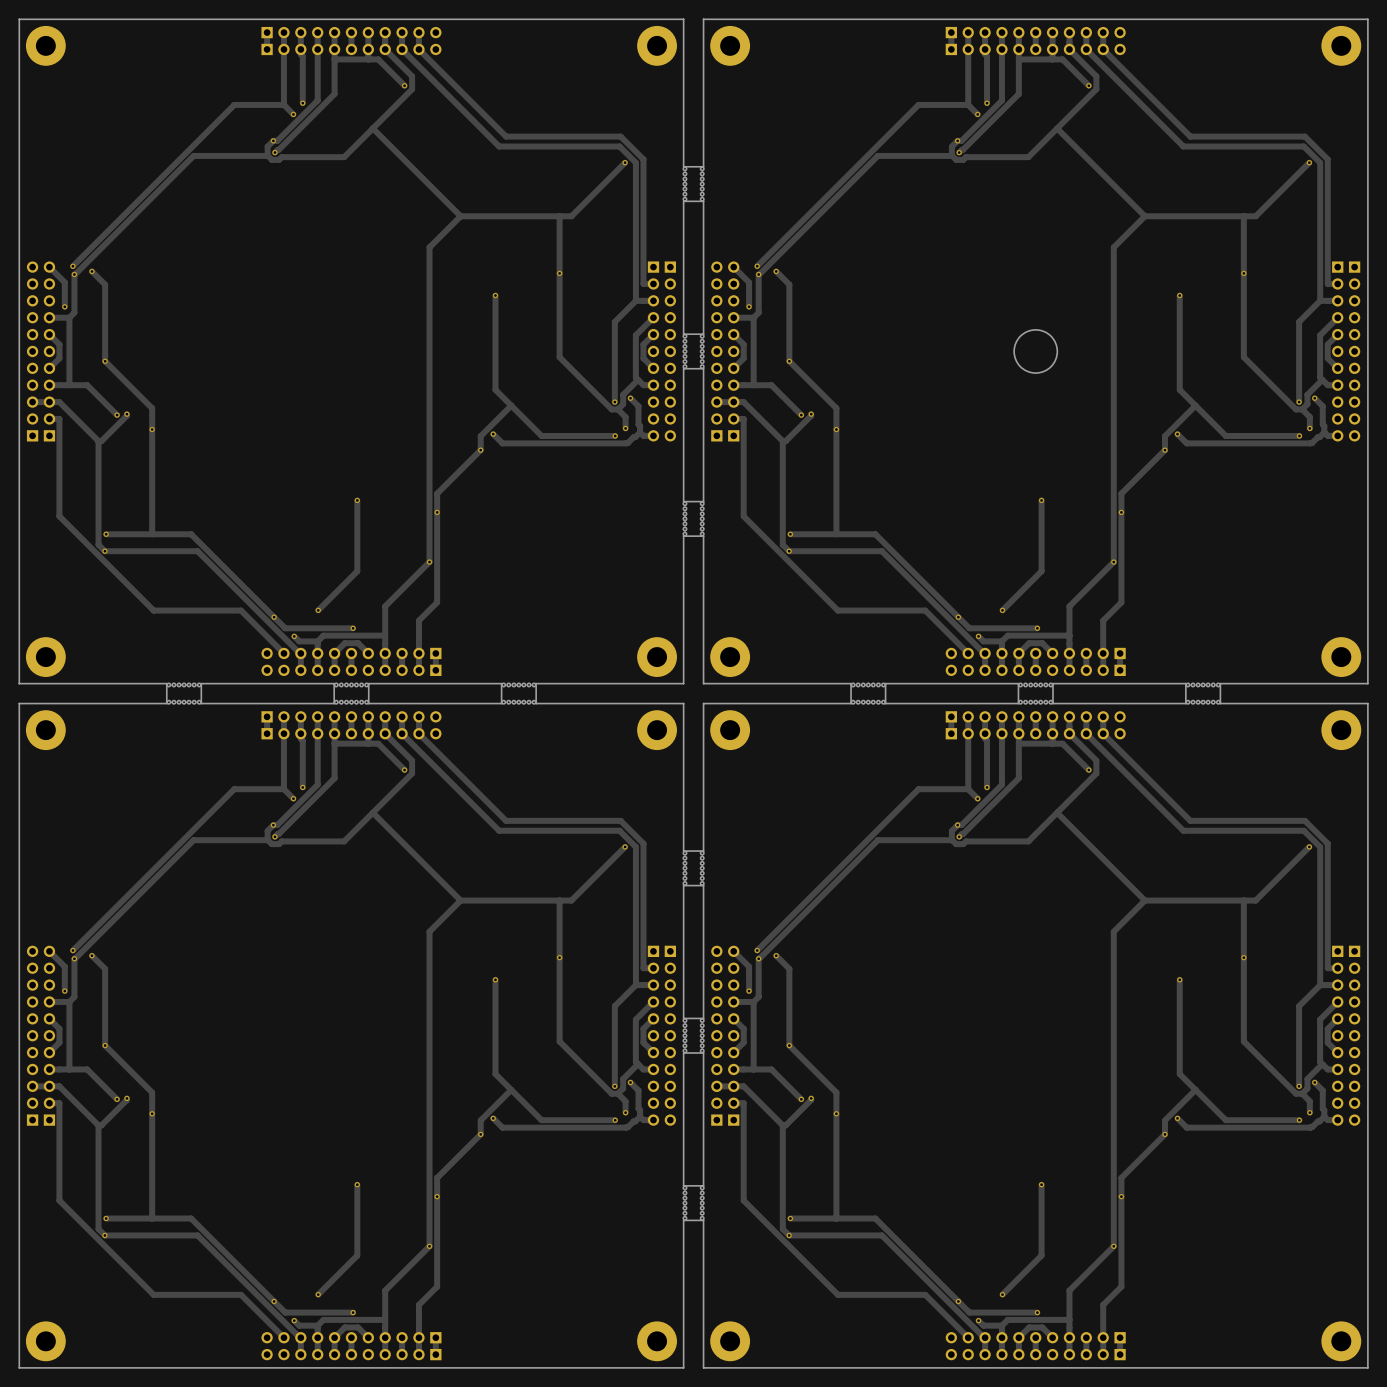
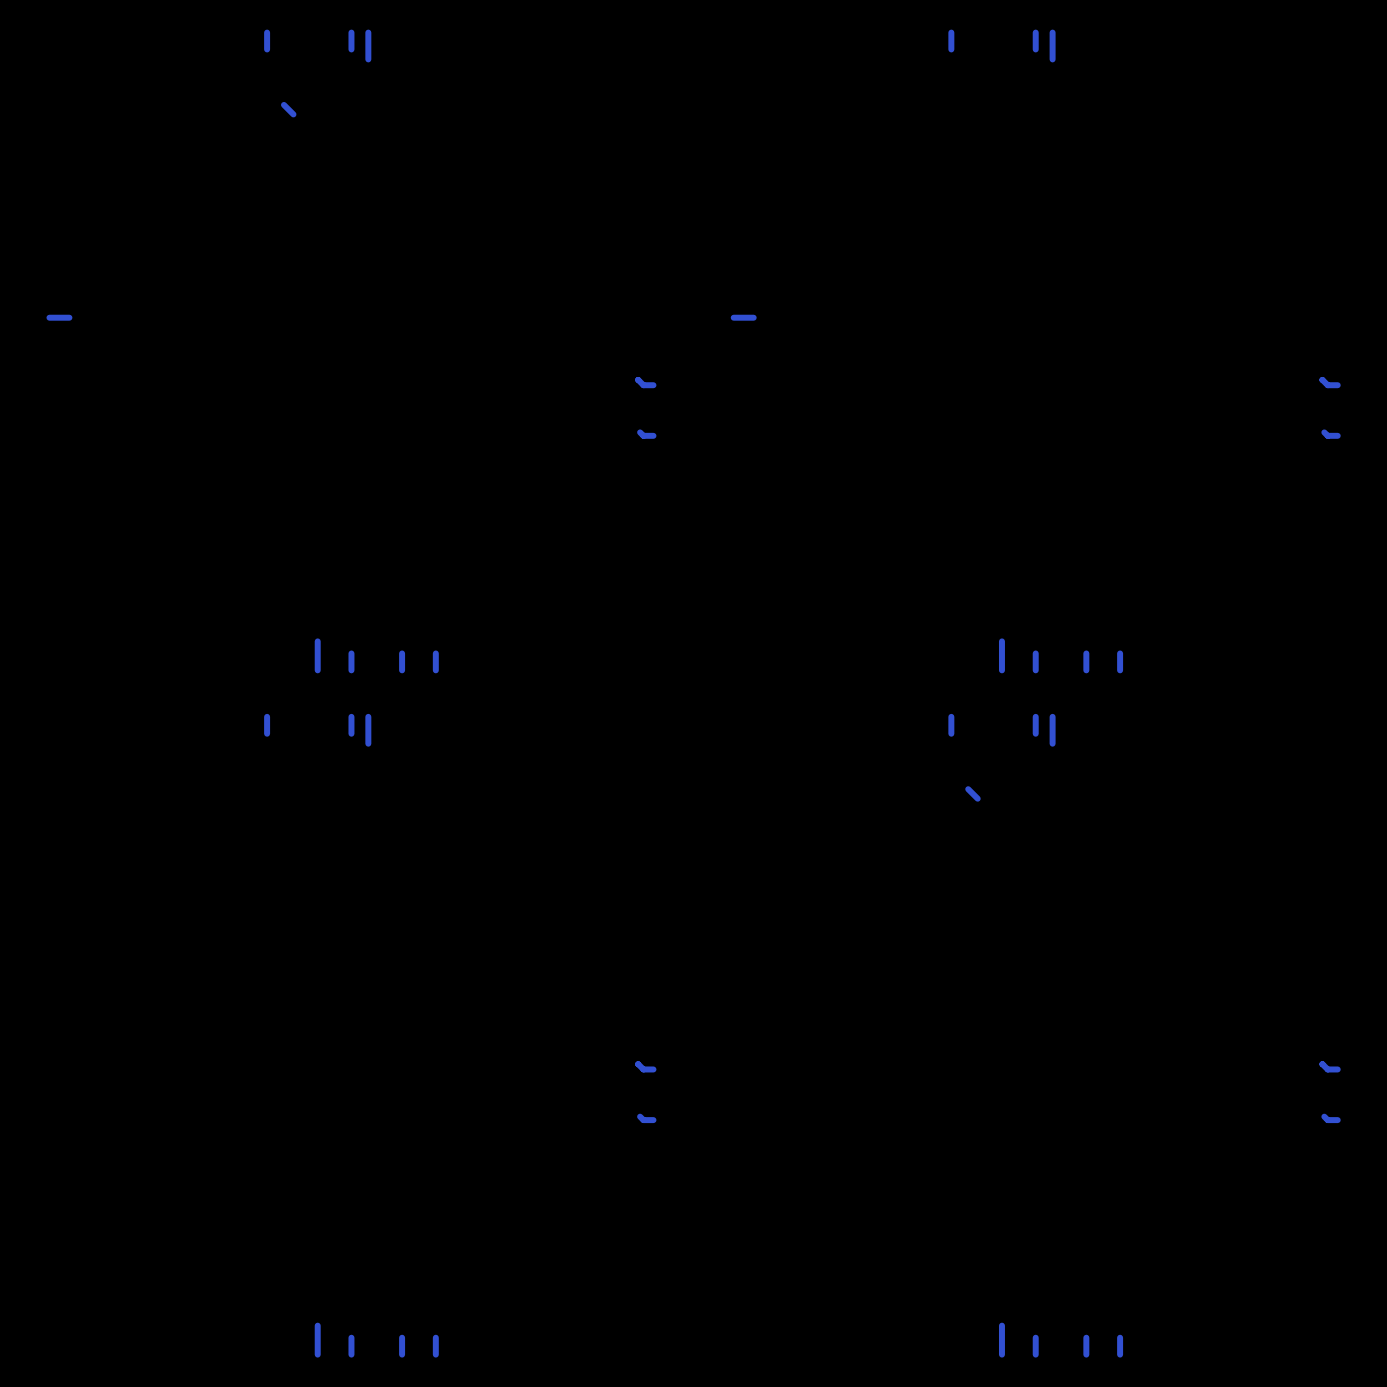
board edge: (1367, 19) (1367, 683) (1220, 683) (1220, 703) (1367, 703) (1367, 1367) (703, 1367) (703, 1220) (683, 1220) (683, 1367) (19, 1367) (19, 703) (166, 703) (166, 683) (19, 683) (19, 19) (683, 19) (683, 166) (703, 166) (703, 19) (1367, 19) -> none
track: (283, 32) (283, 104) (234, 104) (72, 266) -> none
track: (300, 32) (302, 103) -> none
track: (317, 32) (317, 100) (277, 140) (273, 140) (267, 146) (267, 155) -> none
track: (334, 32) (334, 93) (274, 152) -> none
part: (351, 32) -> none
track: (385, 32) (385, 49) (412, 76) (412, 89) (344, 157) (281, 157) (279, 159) (271, 159) (268, 155) (193, 155) (74, 274) (74, 312) (69, 317) (69, 385) -> none
track: (402, 32) (402, 49) (499, 146) (619, 146) (635, 162) (635, 300) -> none
track: (418, 32) (418, 49) (506, 136) (620, 136) (643, 159) (643, 283) (653, 283) -> none
track: (968, 32) (968, 104) -> none
track: (985, 32) (987, 103) -> none
track: (1001, 32) (1001, 100) (961, 140) (957, 140) (951, 146) (951, 155) -> none
track: (1018, 32) (1018, 93) (959, 152) -> none
part: (1035, 32) -> none
track: (1069, 32) (1069, 49) (1096, 76) (1096, 89) (1028, 157) (966, 157) (963, 159) (956, 159) (952, 155) (877, 155) (758, 274) (758, 312) (753, 317) (753, 385) -> none
track: (1086, 32) (1086, 49) (1183, 146) (1303, 146) (1320, 162) (1320, 300) -> none
track: (1103, 32) (1103, 49) (1190, 136) (1304, 136) (1327, 159) (1327, 283) (1337, 283) -> none
part: (45, 45) -> none
part: (657, 45) -> none
part: (730, 45) -> none
part: (1341, 45) -> none
part: (351, 49) -> none
part: (1035, 49) -> none
track: (334, 59) (378, 59) (404, 85) -> none
track: (1018, 59) (1062, 59) (1088, 85) -> none
via: (404, 85) -> none
via: (1088, 85) -> none
via: (302, 103) -> none
via: (987, 103) -> none
track: (968, 104) (977, 114) -> none
track: (968, 104) (918, 104) (757, 266) -> none
via: (293, 114) -> none
via: (977, 114) -> none
track: (372, 128) (460, 216) -> none
track: (1057, 128) (1144, 216) -> none
via: (273, 140) -> none
via: (957, 140) -> none
via: (274, 152) -> none
via: (959, 152) -> none
track: (625, 162) (571, 216) (460, 216) -> none
via: (625, 162) -> none
track: (1309, 162) (1255, 216) (1144, 216) -> none
via: (1309, 162) -> none
part: (693, 184) -> none
board edge: (703, 201) (683, 201) (683, 334) (703, 334) (703, 201) -> none
track: (460, 216) (429, 247) (429, 562) (385, 606) (385, 670) -> none
track: (559, 216) (559, 357) (611, 409) (617, 409) -> none
track: (1144, 216) (1113, 247) (1113, 562) (1069, 606) (1069, 670) -> none
track: (1243, 216) (1243, 357) (1296, 409) (1302, 409) -> none
via: (72, 266) -> none
via: (757, 266) -> none
track: (49, 267) (64, 282) (64, 306) -> none
track: (733, 267) (749, 282) (749, 306) -> none
track: (91, 271) (105, 284) (105, 361) (152, 408) (152, 534) -> none
via: (91, 271) -> none
track: (776, 271) (789, 284) (789, 361) (836, 408) (836, 534) -> none
via: (776, 271) -> none
via: (559, 273) -> none
via: (1243, 273) -> none
via: (74, 274) -> none
via: (758, 274) -> none
track: (495, 295) (495, 389) (541, 435) (615, 435) -> none
via: (495, 295) -> none
track: (1179, 295) (1179, 389) (1225, 435) (1299, 435) -> none
via: (1179, 295) -> none
track: (635, 300) (614, 321) (614, 402) -> none
track: (653, 300) (635, 300) -> none
track: (1320, 300) (1299, 321) (1299, 402) -> none
track: (1337, 300) (1320, 300) -> none
via: (64, 306) -> none
via: (749, 306) -> none
track: (653, 317) (635, 335) (635, 377) (638, 379) (623, 394) (623, 404) (617, 409) -> none
track: (1337, 317) (1320, 335) (1320, 377) (1322, 379) (1307, 394) (1307, 404) (1302, 409) -> none
round board edge: [1013, 329, 1058, 374] -> none
track: (49, 334) (59, 344) (59, 358) (49, 368) -> none
track: (653, 334) (643, 344) (643, 358) (653, 368) -> none
track: (733, 334) (743, 344) (743, 358) (733, 368) -> none
track: (1337, 334) (1327, 344) (1327, 358) (1337, 368) -> none
part: (32, 351) -> none
part: (49, 351) -> none
part: (653, 351) -> none
part: (670, 351) -> none
part: (693, 351) -> none
part: (716, 351) -> none
part: (733, 351) -> none
part: (1337, 351) -> none
part: (1354, 351) -> none
via: (105, 361) -> none
via: (789, 361) -> none
board edge: (703, 368) (703, 501) (683, 501) (683, 368) (703, 368) -> none
track: (49, 385) (87, 385) (117, 415) -> none
track: (733, 385) (771, 385) (801, 415) -> none
track: (630, 398) (638, 406) (640, 432) (626, 443) (502, 443) (493, 434) -> none
via: (630, 398) -> none
track: (1314, 398) (1322, 406) (1324, 432) (1310, 443) (1186, 443) (1177, 434) -> none
via: (1314, 398) -> none
track: (32, 402) (59, 402) (98, 441) -> none
via: (614, 402) -> none
track: (716, 402) (743, 402) (782, 441) -> none
via: (1299, 402) -> none
track: (511, 405) (480, 436) (480, 450) (437, 493) (437, 602) (418, 620) (418, 670) -> none
track: (1195, 405) (1164, 436) (1164, 450) (1121, 493) (1121, 602) (1103, 620) (1103, 670) -> none
track: (617, 409) (625, 417) (625, 428) -> none
track: (1302, 409) (1309, 417) (1309, 428) -> none
track: (126, 414) (101, 441) (98, 441) -> none
via: (126, 414) -> none
track: (811, 414) (785, 441) (782, 441) -> none
via: (811, 414) -> none
via: (117, 415) -> none
via: (801, 415) -> none
track: (49, 418) (59, 418) (59, 516) (153, 610) (241, 610) (283, 653) -> none
track: (733, 418) (743, 418) (743, 516) (837, 610) (925, 610) (968, 653) -> none
via: (625, 428) -> none
via: (1309, 428) -> none
via: (152, 429) -> none
via: (836, 429) -> none
via: (493, 434) -> none
via: (1177, 434) -> none
via: (615, 435) -> none
via: (1299, 435) -> none
track: (98, 441) (98, 544) (104, 551) (197, 551) (300, 653) (300, 670) -> none
track: (782, 441) (782, 544) (789, 551) (881, 551) (985, 653) (985, 670) -> none
via: (480, 450) -> none
via: (1164, 450) -> none
track: (357, 500) (357, 571) (318, 610) -> none
via: (357, 500) -> none
track: (1041, 500) (1041, 571) (1002, 610) -> none
via: (1041, 500) -> none
via: (437, 512) -> none
via: (1121, 512) -> none
part: (693, 518) -> none
track: (106, 534) (191, 534) (285, 628) (353, 628) -> none
via: (106, 534) -> none
track: (790, 534) (875, 534) (969, 628) (1037, 628) -> none
via: (790, 534) -> none
board edge: (703, 536) (703, 683) (851, 683) (851, 703) (703, 703) (703, 851) (683, 851) (683, 703) (536, 703) (536, 683) (683, 683) (683, 536) (703, 536) -> none
via: (104, 551) -> none
via: (789, 551) -> none
via: (429, 562) -> none
via: (1113, 562) -> none
via: (318, 610) -> none
via: (1002, 610) -> none
via: (274, 617) -> none
via: (958, 617) -> none
via: (353, 628) -> none
via: (1037, 628) -> none
track: (385, 635) (323, 635) (317, 641) (299, 641) (294, 636) -> none
track: (1069, 635) (1007, 635) (1001, 641) (983, 641) (978, 636) -> none
via: (294, 636) -> none
via: (978, 636) -> none
part: (351, 653) -> none
track: (368, 653) (358, 643) (344, 643) (334, 653) (334, 670) -> none
part: (1035, 653) -> none
track: (1052, 653) (1042, 643) (1029, 643) (1018, 653) (1018, 670) -> none
part: (45, 657) -> none
part: (657, 657) -> none
part: (730, 657) -> none
part: (1341, 657) -> none
part: (351, 670) -> none
part: (1035, 670) -> none
board edge: (334, 683) (201, 683) (201, 703) (334, 703) (334, 683) -> none
board edge: (501, 683) (368, 683) (368, 703) (501, 703) (501, 683) -> none
board edge: (1018, 683) (885, 683) (885, 703) (1018, 703) (1018, 683) -> none
board edge: (1185, 683) (1052, 683) (1052, 703) (1185, 703) (1185, 683) -> none
part: (184, 693) -> none
part: (351, 693) -> none
part: (518, 693) -> none
part: (868, 693) -> none
part: (1035, 693) -> none
part: (1203, 693) -> none
track: (283, 716) (283, 789) -> none
track: (300, 716) (302, 787) -> none
track: (317, 716) (317, 784) (277, 825) (273, 825) (267, 830) (267, 840) -> none
track: (334, 716) (334, 778) (274, 836) -> none
part: (351, 716) -> none
track: (385, 716) (385, 733) (412, 760) (412, 773) (372, 812) -> none
track: (402, 716) (402, 733) (499, 830) (619, 830) (635, 847) (635, 985) -> none
track: (418, 716) (418, 733) (506, 820) (620, 820) (643, 843) (643, 968) (653, 968) -> none
track: (968, 716) (968, 789) (918, 789) (757, 950) -> none
track: (985, 716) (987, 787) -> none
track: (1001, 716) (1001, 784) (961, 825) (957, 825) (951, 830) (951, 840) -> none
track: (1018, 716) (1018, 778) (959, 836) -> none
part: (1035, 716) -> none
track: (1069, 716) (1069, 733) (1096, 760) (1096, 773) (1028, 841) (966, 841) (963, 844) (956, 844) (952, 840) (877, 840) (758, 958) (758, 996) (753, 1001) -> none
track: (1086, 716) (1086, 733) (1183, 830) (1303, 830) (1320, 847) (1320, 985) -> none
track: (1103, 716) (1103, 733) (1190, 820) (1304, 820) (1327, 843) (1327, 968) (1337, 968) -> none
part: (45, 730) -> none
part: (657, 730) -> none
part: (730, 730) -> none
part: (1341, 730) -> none
part: (351, 733) -> none
part: (1035, 733) -> none
track: (334, 743) (378, 743) (404, 769) -> none
track: (1018, 743) (1062, 743) (1088, 769) -> none
via: (404, 769) -> none
via: (1088, 769) -> none
via: (302, 787) -> none
via: (987, 787) -> none
track: (283, 789) (293, 798) -> none
track: (283, 789) (234, 789) (72, 950) -> none
via: (293, 798) -> none
via: (977, 798) -> none
track: (372, 812) (344, 841) (281, 841) (279, 844) (271, 844) (268, 840) (193, 840) (74, 958) (74, 996) (69, 1001) -> none
track: (372, 812) (460, 900) -> none
track: (1057, 812) (1144, 900) -> none
via: (273, 825) -> none
via: (957, 825) -> none
via: (274, 836) -> none
via: (959, 836) -> none
track: (625, 846) (571, 900) (460, 900) -> none
via: (625, 846) -> none
track: (1309, 846) (1255, 900) (1144, 900) -> none
via: (1309, 846) -> none
part: (693, 868) -> none
board edge: (703, 885) (703, 1018) (683, 1018) (683, 885) (703, 885) -> none
track: (460, 900) (429, 931) (429, 1246) (385, 1290) (385, 1354) -> none
track: (559, 900) (559, 1041) (611, 1093) (617, 1093) -> none
track: (1144, 900) (1113, 931) (1113, 1246) (1069, 1290) (1069, 1354) -> none
track: (1243, 900) (1243, 1041) (1296, 1093) (1302, 1093) -> none
via: (72, 950) -> none
via: (757, 950) -> none
track: (49, 951) (64, 966) (64, 991) -> none
track: (733, 951) (749, 966) (749, 991) -> none
track: (91, 955) (105, 968) (105, 1045) (152, 1092) (152, 1218) -> none
via: (91, 955) -> none
track: (776, 955) (789, 968) (789, 1045) (836, 1092) (836, 1218) -> none
via: (776, 955) -> none
via: (559, 957) -> none
via: (1243, 957) -> none
via: (74, 958) -> none
via: (758, 958) -> none
track: (495, 979) (495, 1074) (541, 1120) (615, 1120) -> none
via: (495, 979) -> none
track: (1179, 979) (1179, 1074) (1225, 1120) (1299, 1120) -> none
via: (1179, 979) -> none
track: (635, 985) (614, 1006) (614, 1086) -> none
track: (653, 985) (635, 985) -> none
track: (1320, 985) (1299, 1006) (1299, 1086) -> none
track: (1337, 985) (1320, 985) -> none
via: (64, 991) -> none
via: (749, 991) -> none
track: (69, 1001) (69, 1069) -> none
track: (69, 1001) (49, 1001) -> none
track: (653, 1001) (635, 1019) (635, 1062) (638, 1064) (623, 1079) (623, 1088) (617, 1093) -> none
track: (753, 1001) (753, 1069) -> none
track: (753, 1001) (733, 1001) -> none
track: (1337, 1001) (1320, 1019) (1320, 1062) (1322, 1064) (1307, 1079) (1307, 1088) (1302, 1093) -> none
track: (49, 1018) (59, 1028) (59, 1042) (49, 1052) -> none
track: (653, 1018) (643, 1028) (643, 1042) (653, 1052) -> none
track: (733, 1018) (743, 1028) (743, 1042) (733, 1052) -> none
track: (1337, 1018) (1327, 1028) (1327, 1042) (1337, 1052) -> none
part: (32, 1035) -> none
part: (49, 1035) -> none
part: (653, 1035) -> none
part: (670, 1035) -> none
part: (693, 1035) -> none
part: (716, 1035) -> none
part: (733, 1035) -> none
part: (1337, 1035) -> none
part: (1354, 1035) -> none
via: (105, 1045) -> none
via: (789, 1045) -> none
board edge: (703, 1052) (703, 1185) (683, 1185) (683, 1052) (703, 1052) -> none
track: (49, 1069) (87, 1069) (117, 1099) -> none
track: (733, 1069) (771, 1069) (801, 1099) -> none
track: (630, 1082) (638, 1090) (640, 1116) (626, 1127) (502, 1127) (493, 1118) -> none
via: (630, 1082) -> none
track: (1314, 1082) (1322, 1090) (1324, 1116) (1310, 1127) (1186, 1127) (1177, 1118) -> none
via: (1314, 1082) -> none
track: (32, 1086) (59, 1086) (98, 1125) -> none
via: (614, 1086) -> none
track: (716, 1086) (743, 1086) (782, 1125) -> none
via: (1299, 1086) -> none
track: (511, 1089) (480, 1120) (480, 1134) (437, 1177) (437, 1286) (418, 1304) (418, 1354) -> none
track: (1195, 1089) (1164, 1120) (1164, 1134) (1121, 1177) (1121, 1286) (1103, 1304) (1103, 1354) -> none
track: (617, 1093) (625, 1101) (625, 1112) -> none
track: (1302, 1093) (1309, 1101) (1309, 1112) -> none
track: (126, 1098) (101, 1125) (98, 1125) -> none
via: (126, 1098) -> none
track: (811, 1098) (785, 1125) (782, 1125) -> none
via: (811, 1098) -> none
via: (117, 1099) -> none
via: (801, 1099) -> none
track: (49, 1103) (59, 1103) (59, 1200) (153, 1294) (241, 1294) (283, 1337) -> none
track: (733, 1103) (743, 1103) (743, 1200) (837, 1294) (925, 1294) (968, 1337) -> none
via: (625, 1112) -> none
via: (1309, 1112) -> none
via: (152, 1113) -> none
via: (836, 1113) -> none
via: (493, 1118) -> none
via: (1177, 1118) -> none
via: (615, 1120) -> none
via: (1299, 1120) -> none
track: (98, 1125) (98, 1229) (104, 1235) (197, 1235) (300, 1337) (300, 1354) -> none
track: (782, 1125) (782, 1229) (789, 1235) (881, 1235) (985, 1337) (985, 1354) -> none
via: (480, 1134) -> none
via: (1164, 1134) -> none
track: (357, 1184) (357, 1255) (318, 1294) -> none
via: (357, 1184) -> none
track: (1041, 1184) (1041, 1255) (1002, 1294) -> none
via: (1041, 1184) -> none
via: (437, 1196) -> none
via: (1121, 1196) -> none
part: (693, 1203) -> none
track: (106, 1218) (191, 1218) (285, 1312) (353, 1312) -> none
via: (106, 1218) -> none
track: (790, 1218) (875, 1218) (969, 1312) (1037, 1312) -> none
via: (790, 1218) -> none
via: (104, 1235) -> none
via: (789, 1235) -> none
via: (429, 1246) -> none
via: (1113, 1246) -> none
via: (318, 1294) -> none
via: (1002, 1294) -> none
via: (274, 1301) -> none
via: (958, 1301) -> none
via: (353, 1312) -> none
via: (1037, 1312) -> none
track: (385, 1319) (323, 1319) (317, 1325) (299, 1325) (294, 1320) -> none
track: (1069, 1319) (1007, 1319) (1001, 1325) (983, 1325) (978, 1320) -> none
via: (294, 1320) -> none
via: (978, 1320) -> none
part: (351, 1337) -> none
track: (368, 1337) (358, 1327) (344, 1327) (334, 1337) (334, 1354) -> none
part: (1035, 1337) -> none
track: (1052, 1337) (1042, 1327) (1029, 1327) (1018, 1337) (1018, 1354) -> none
part: (45, 1341) -> none
part: (657, 1341) -> none
part: (730, 1341) -> none
part: (1341, 1341) -> none
part: (351, 1354) -> none
part: (1035, 1354) -> none

